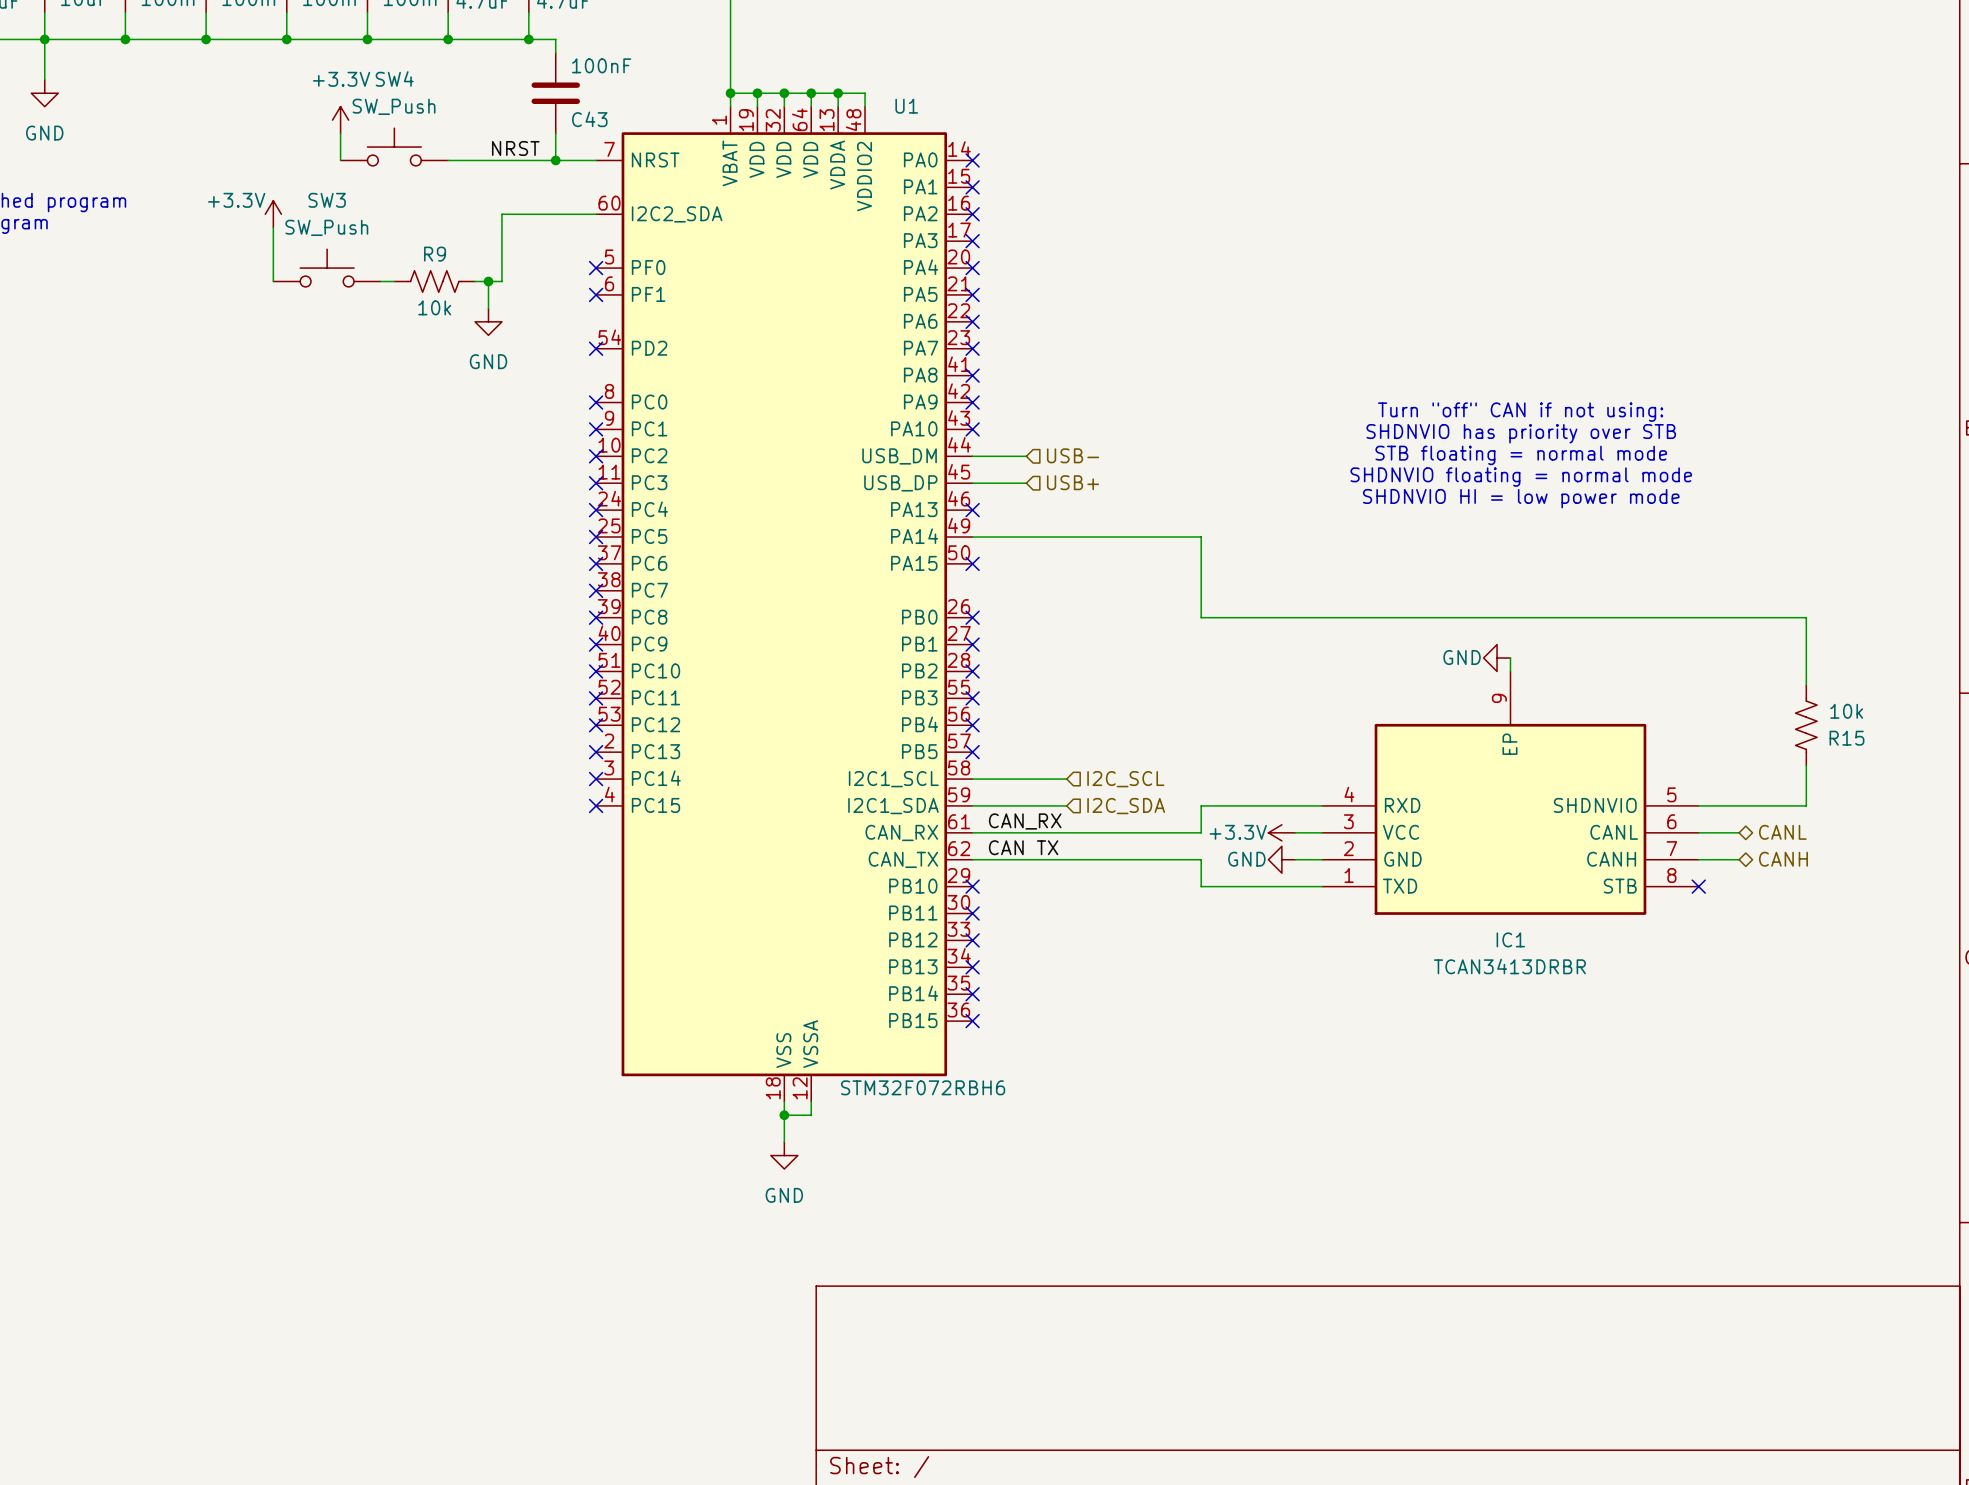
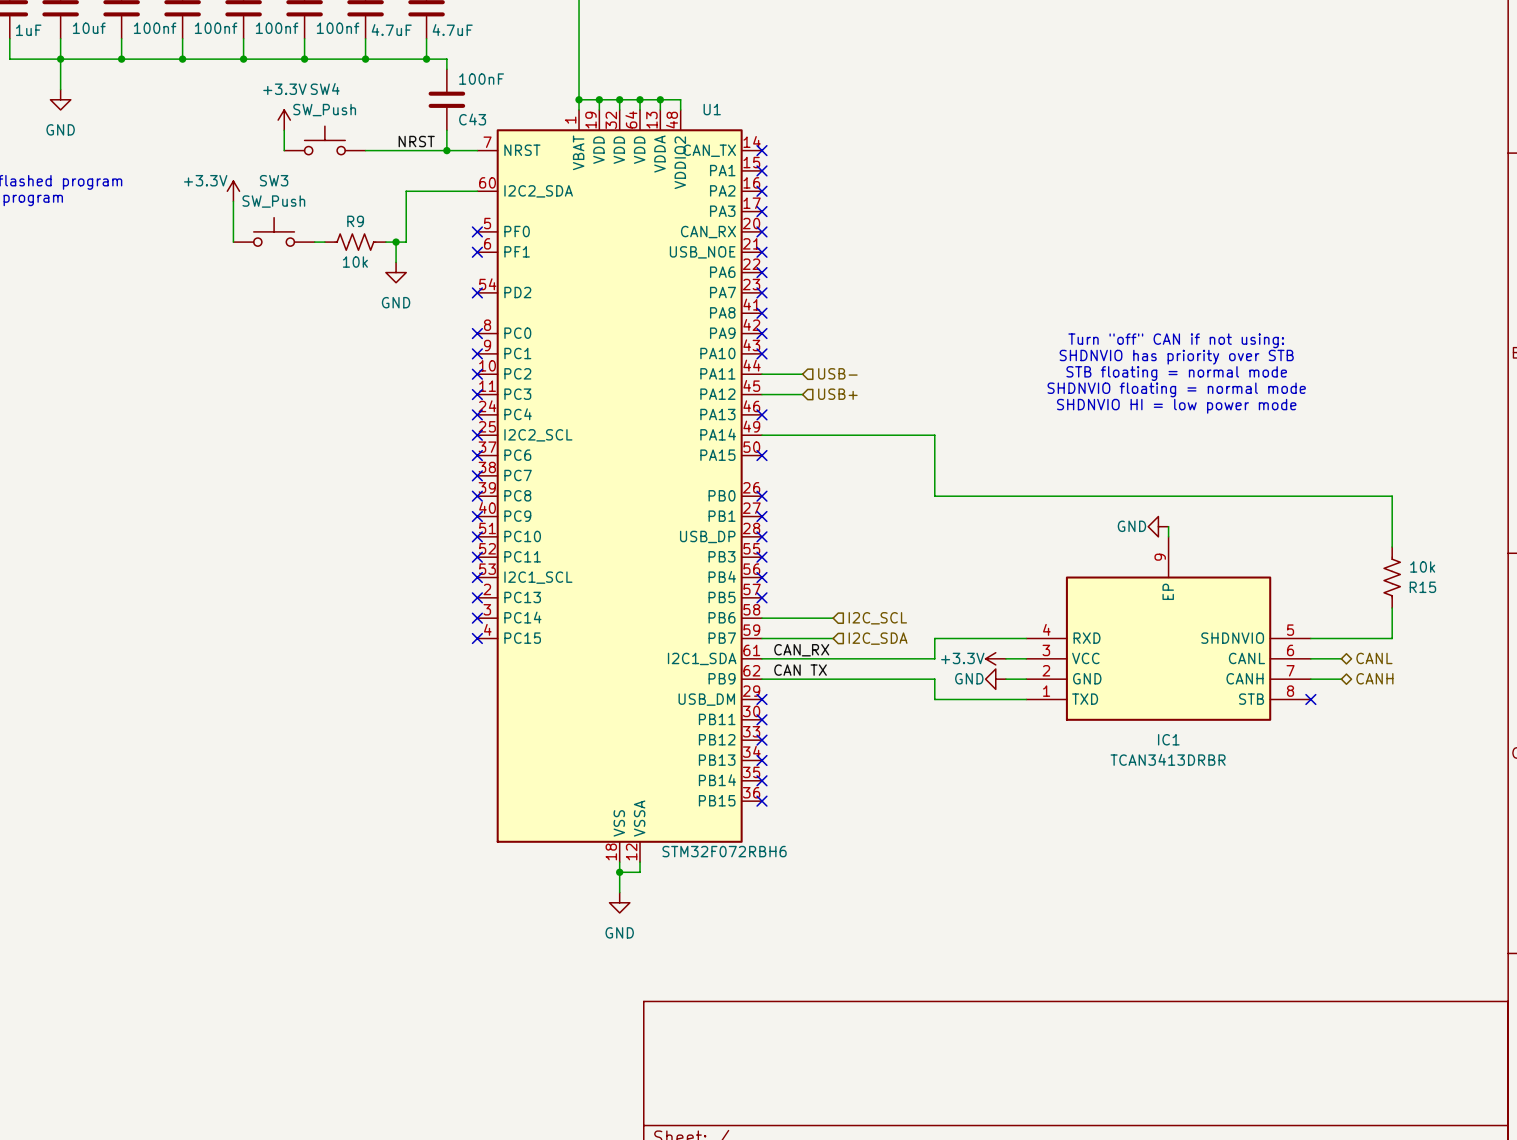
U1 symbol: [596, 106, 973, 1102] -> [477, 109, 762, 863]

